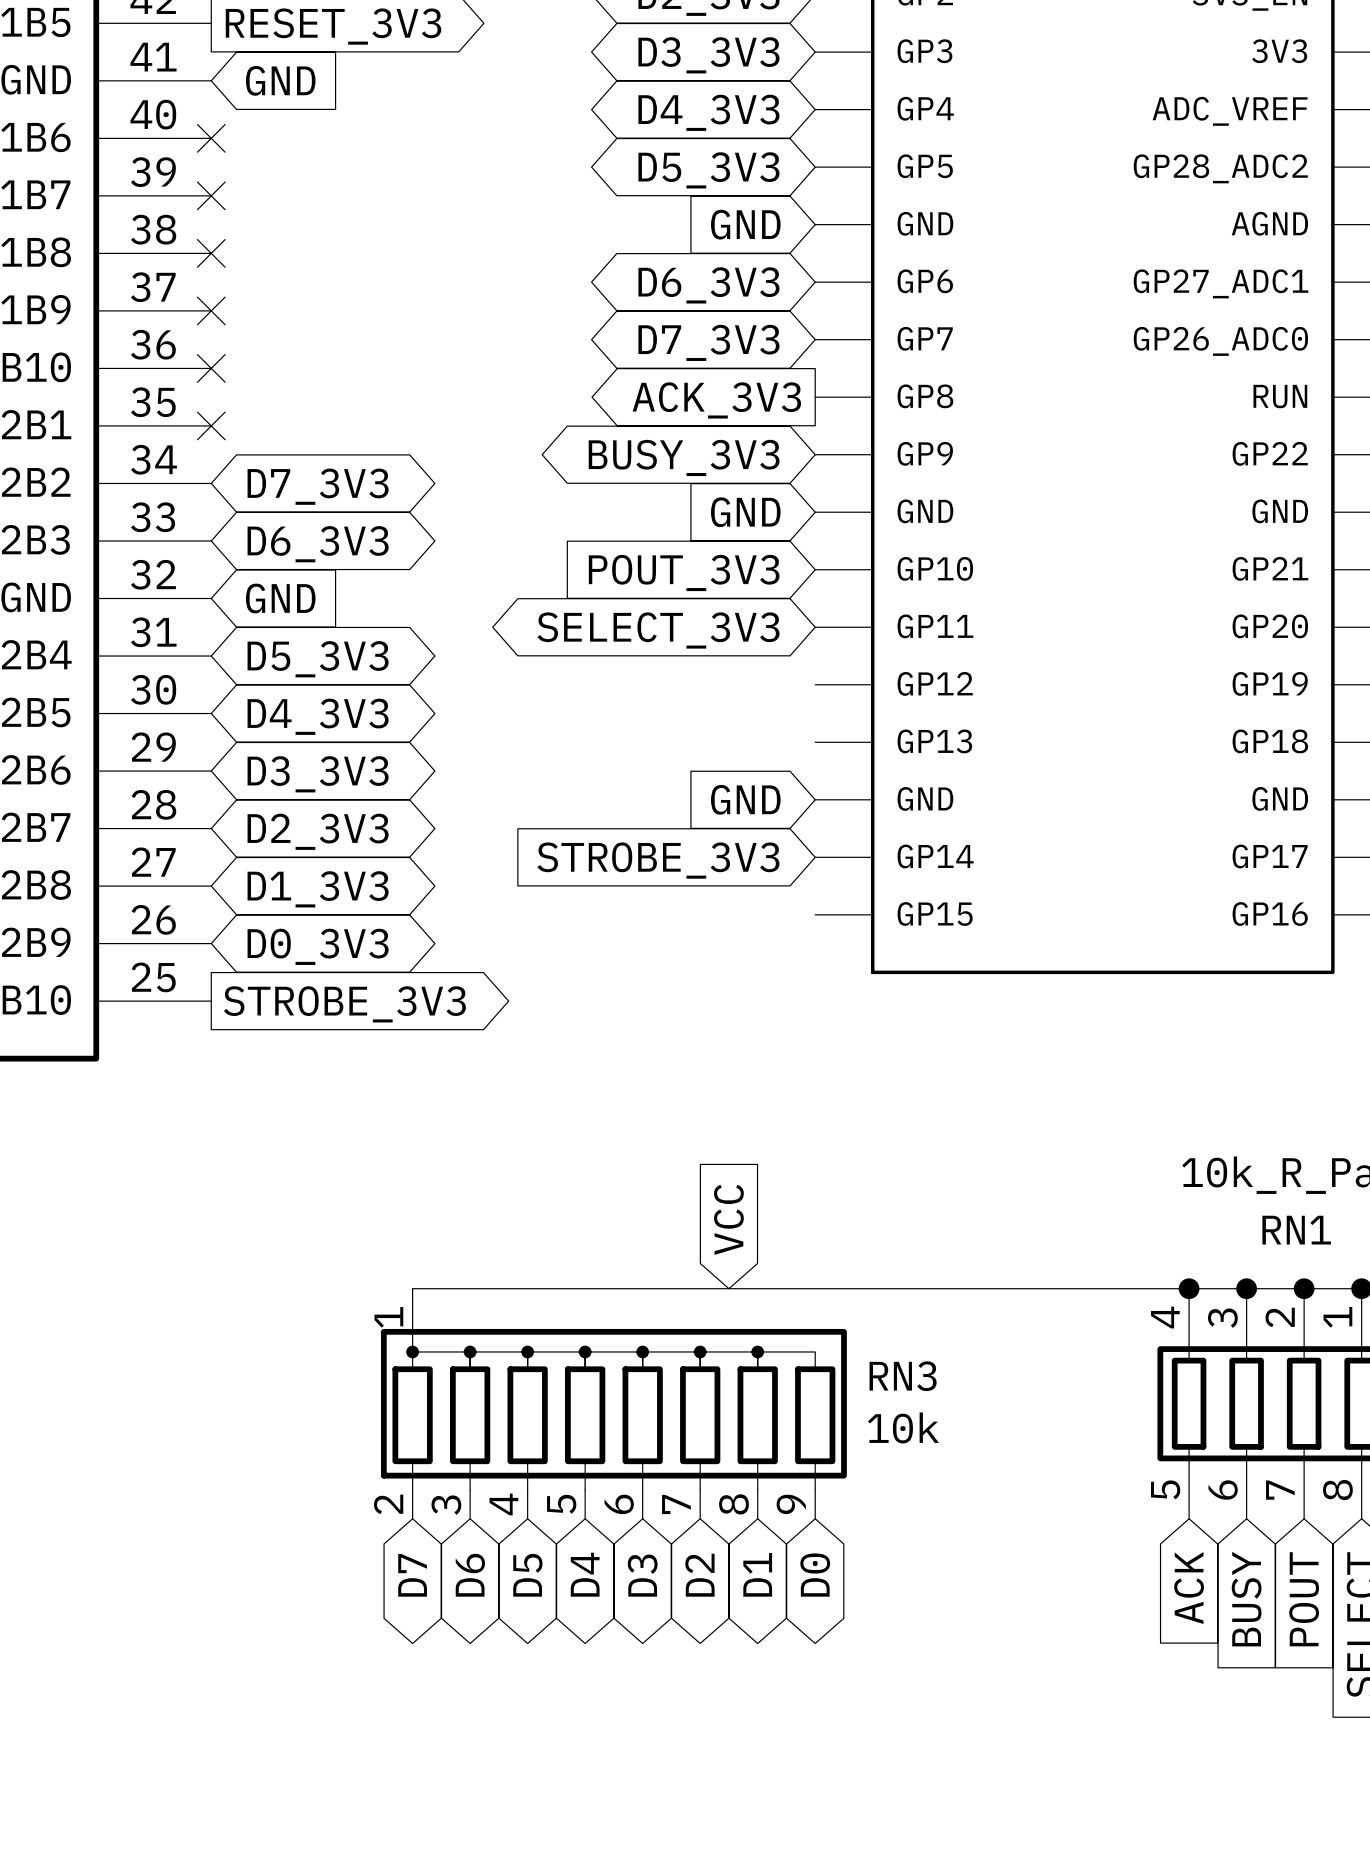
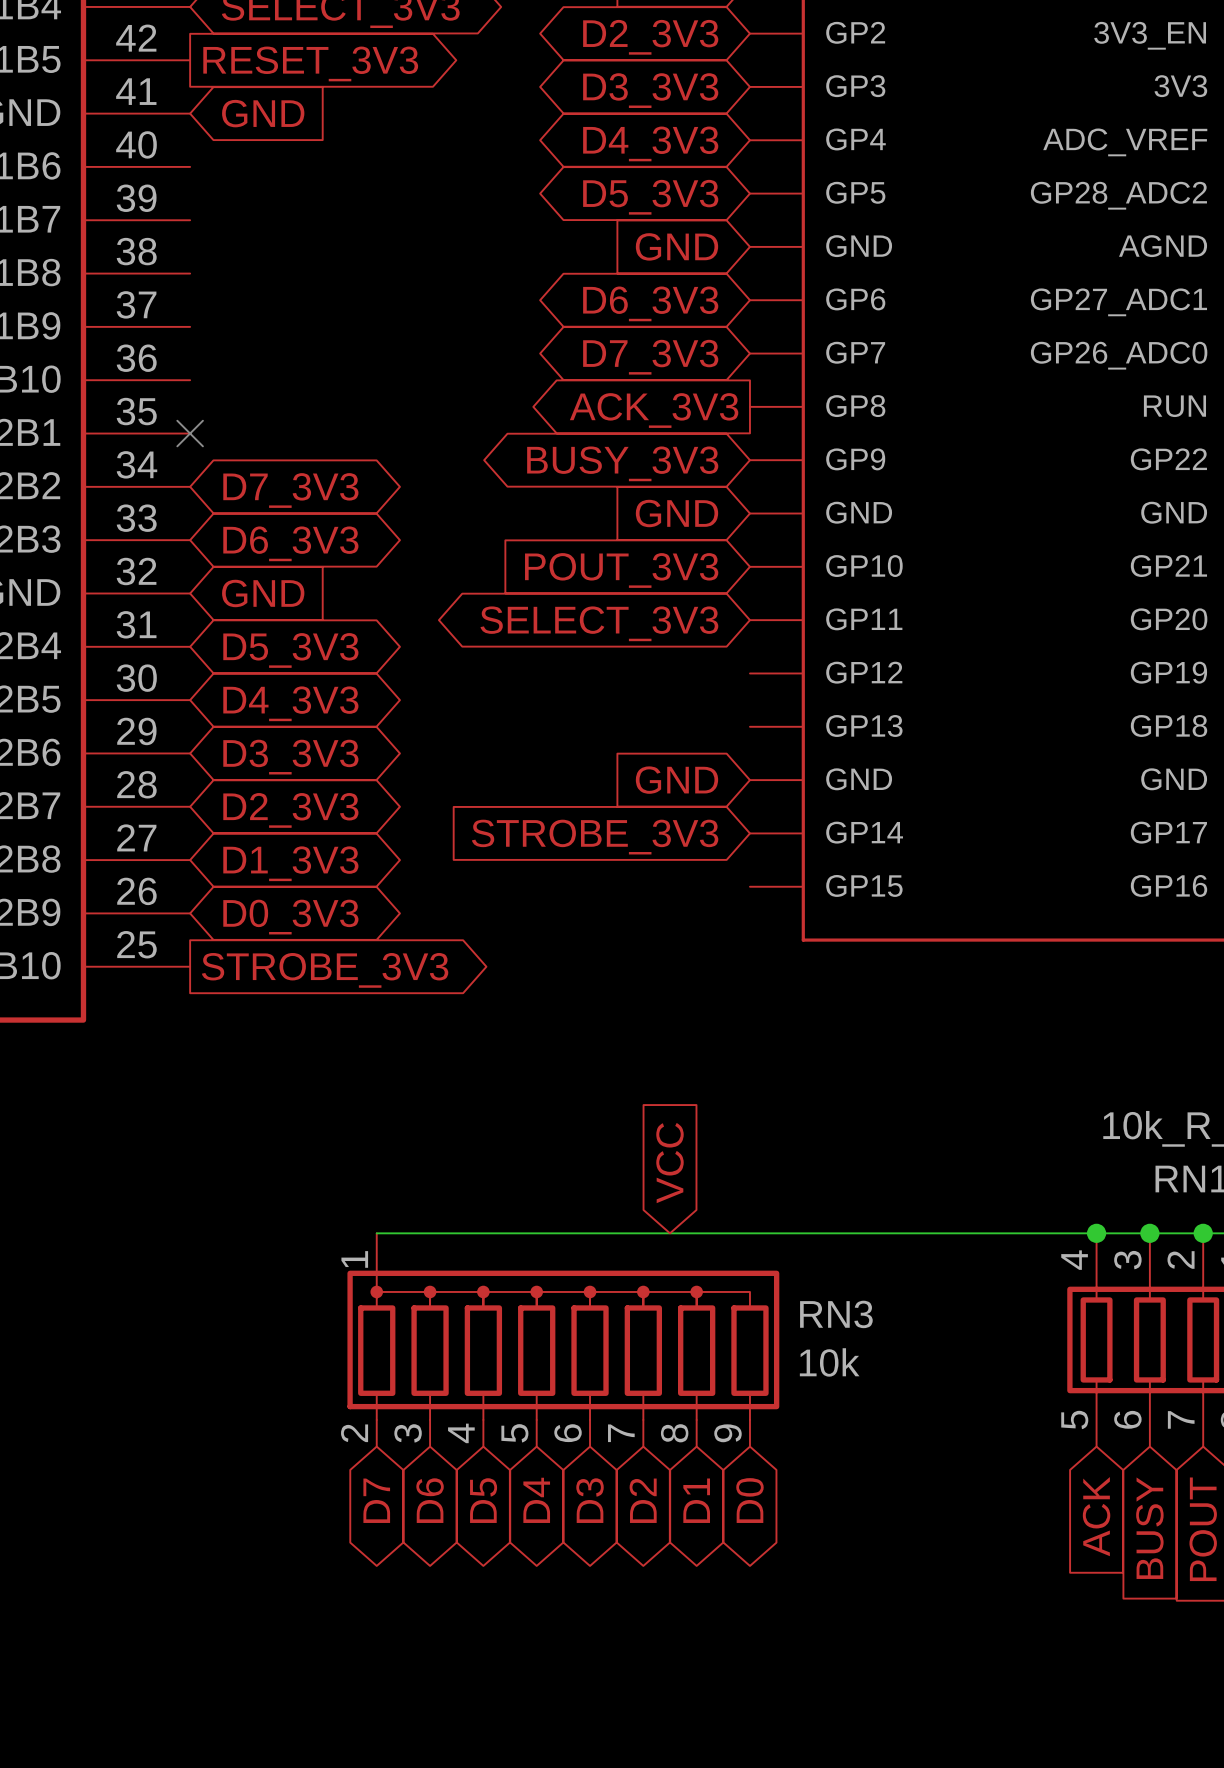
no-connect mark: (211, 138) -> none
no-connect mark: (211, 195) -> none
no-connect mark: (211, 253) -> none
no-connect mark: (211, 310) -> none
no-connect mark: (211, 368) -> none

